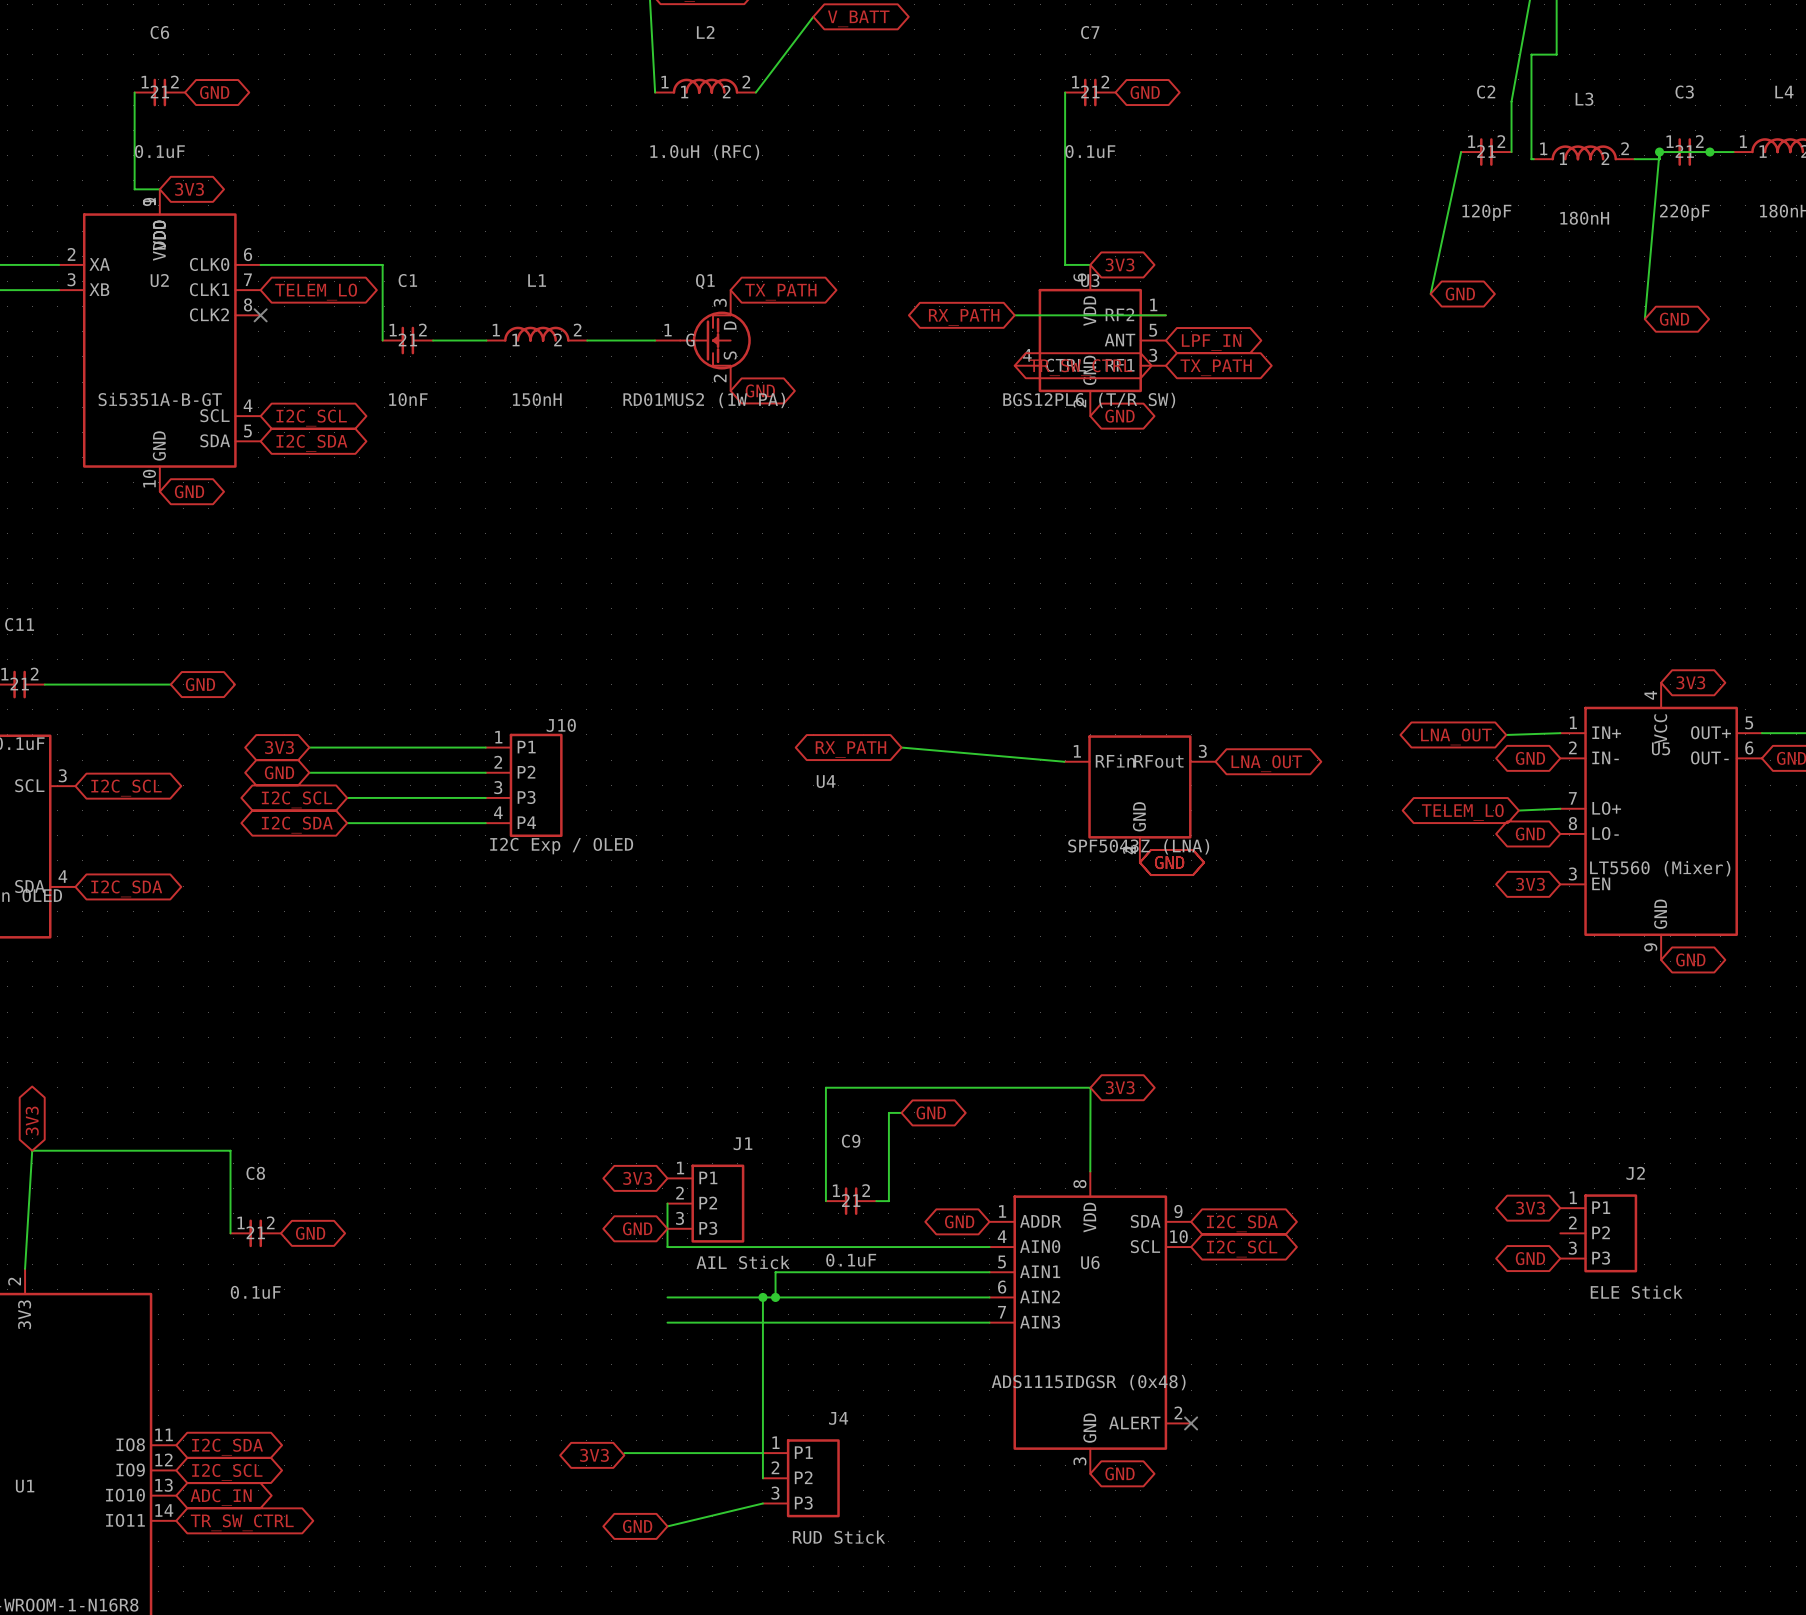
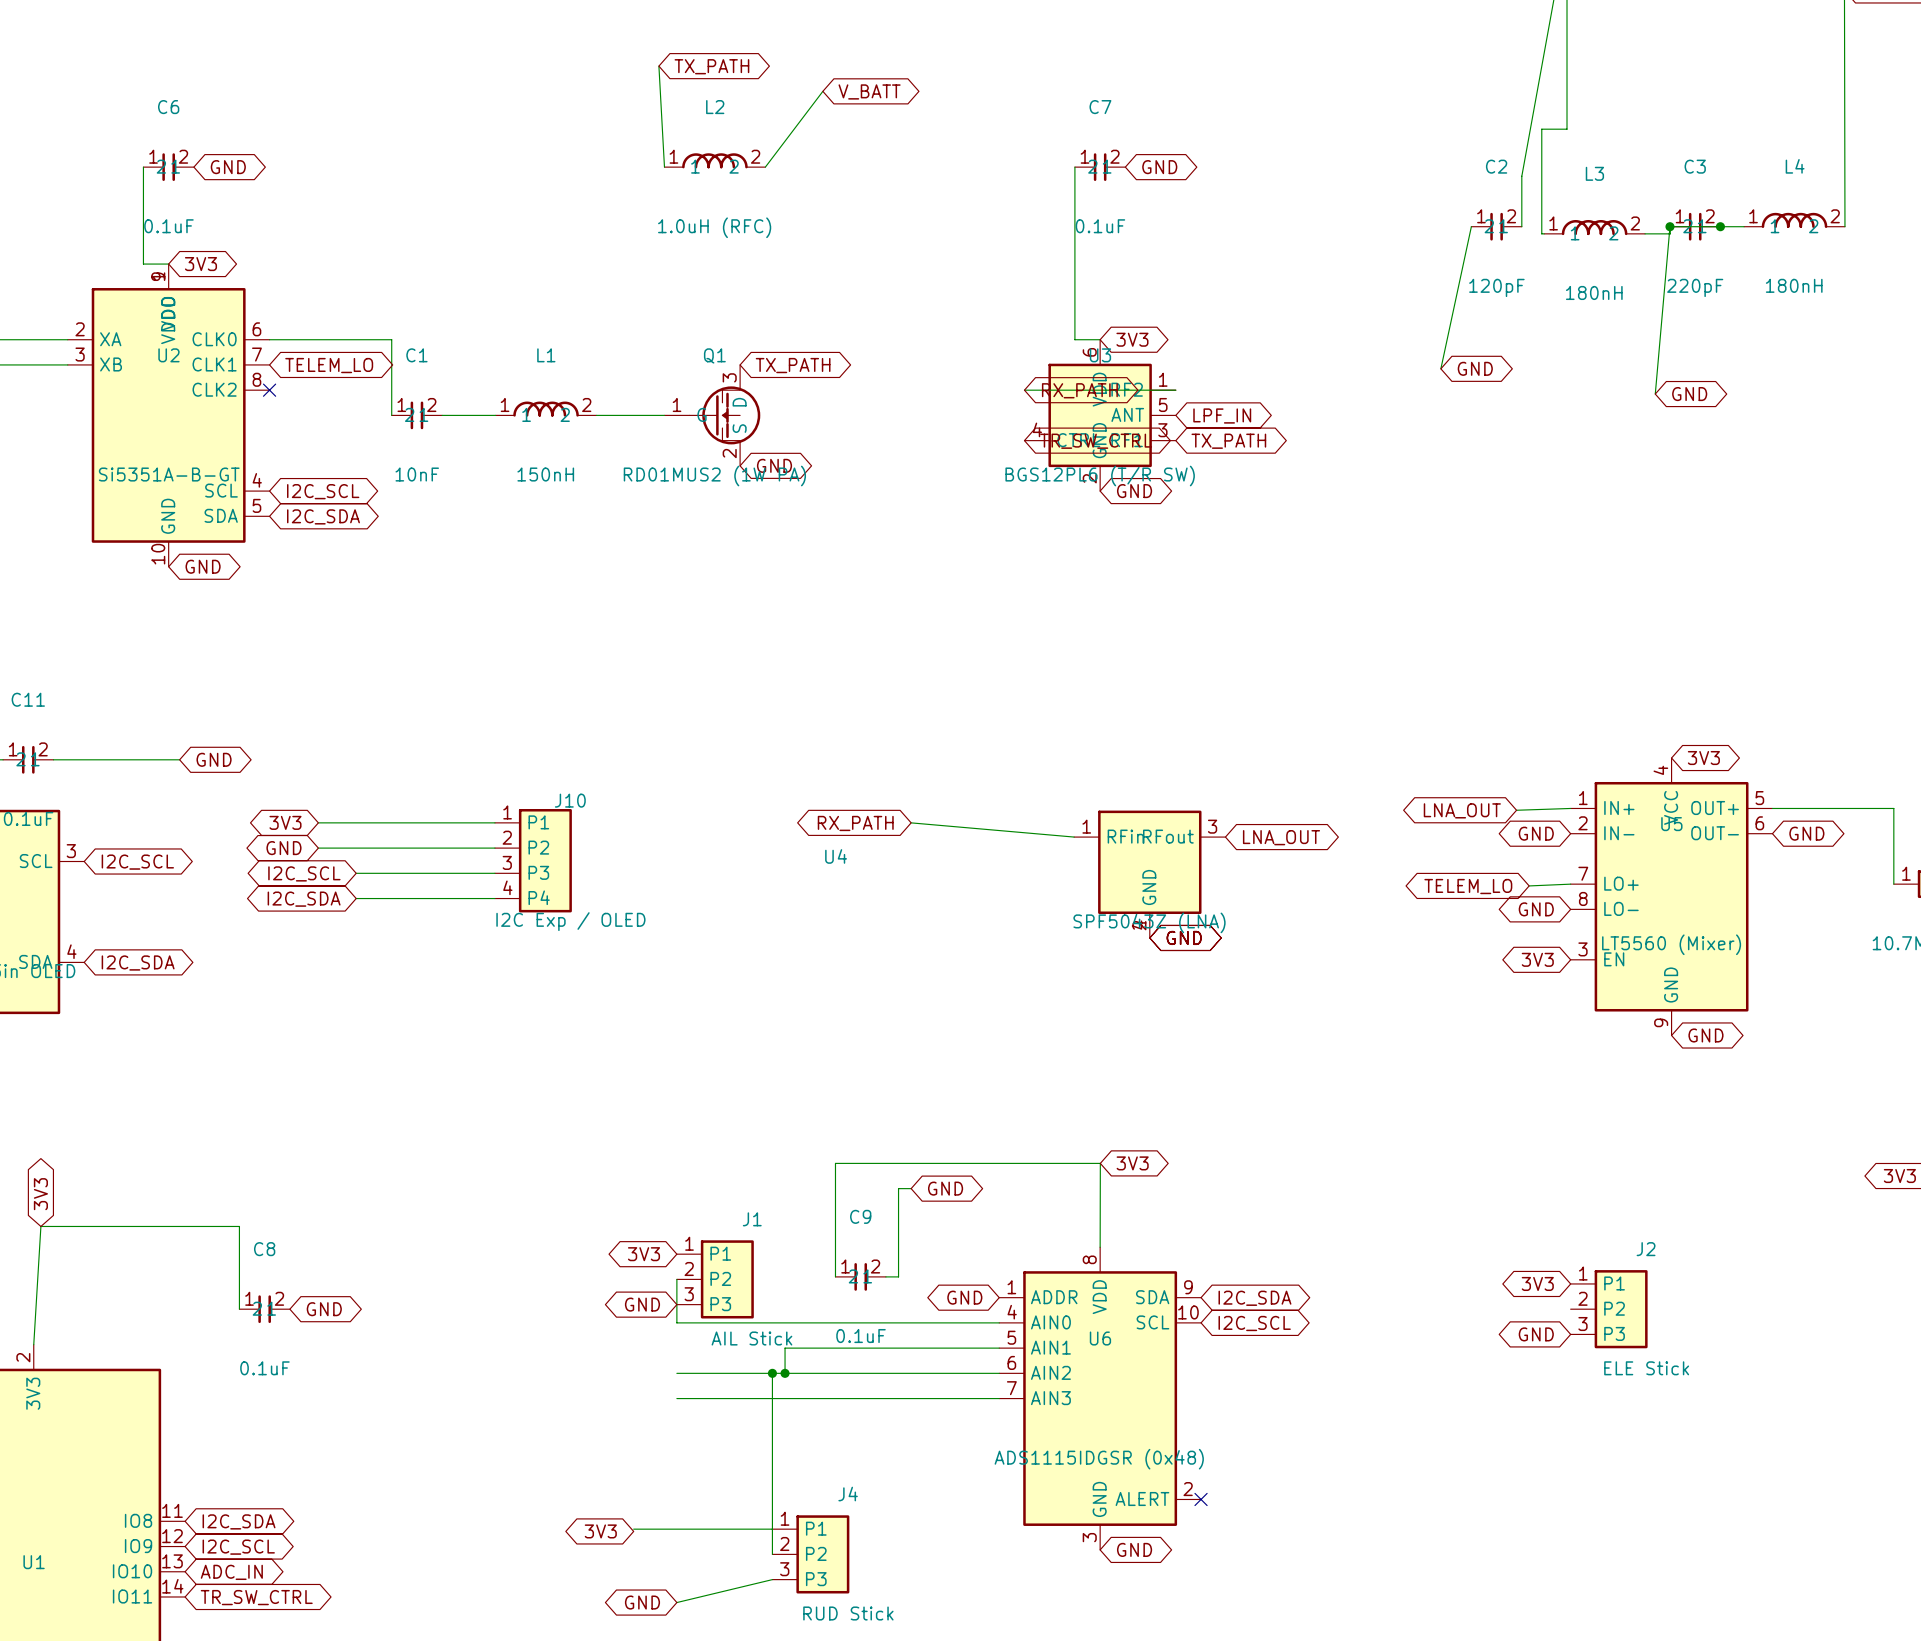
global label rotation: 0° (964, 317) -> 180° (1079, 390)

